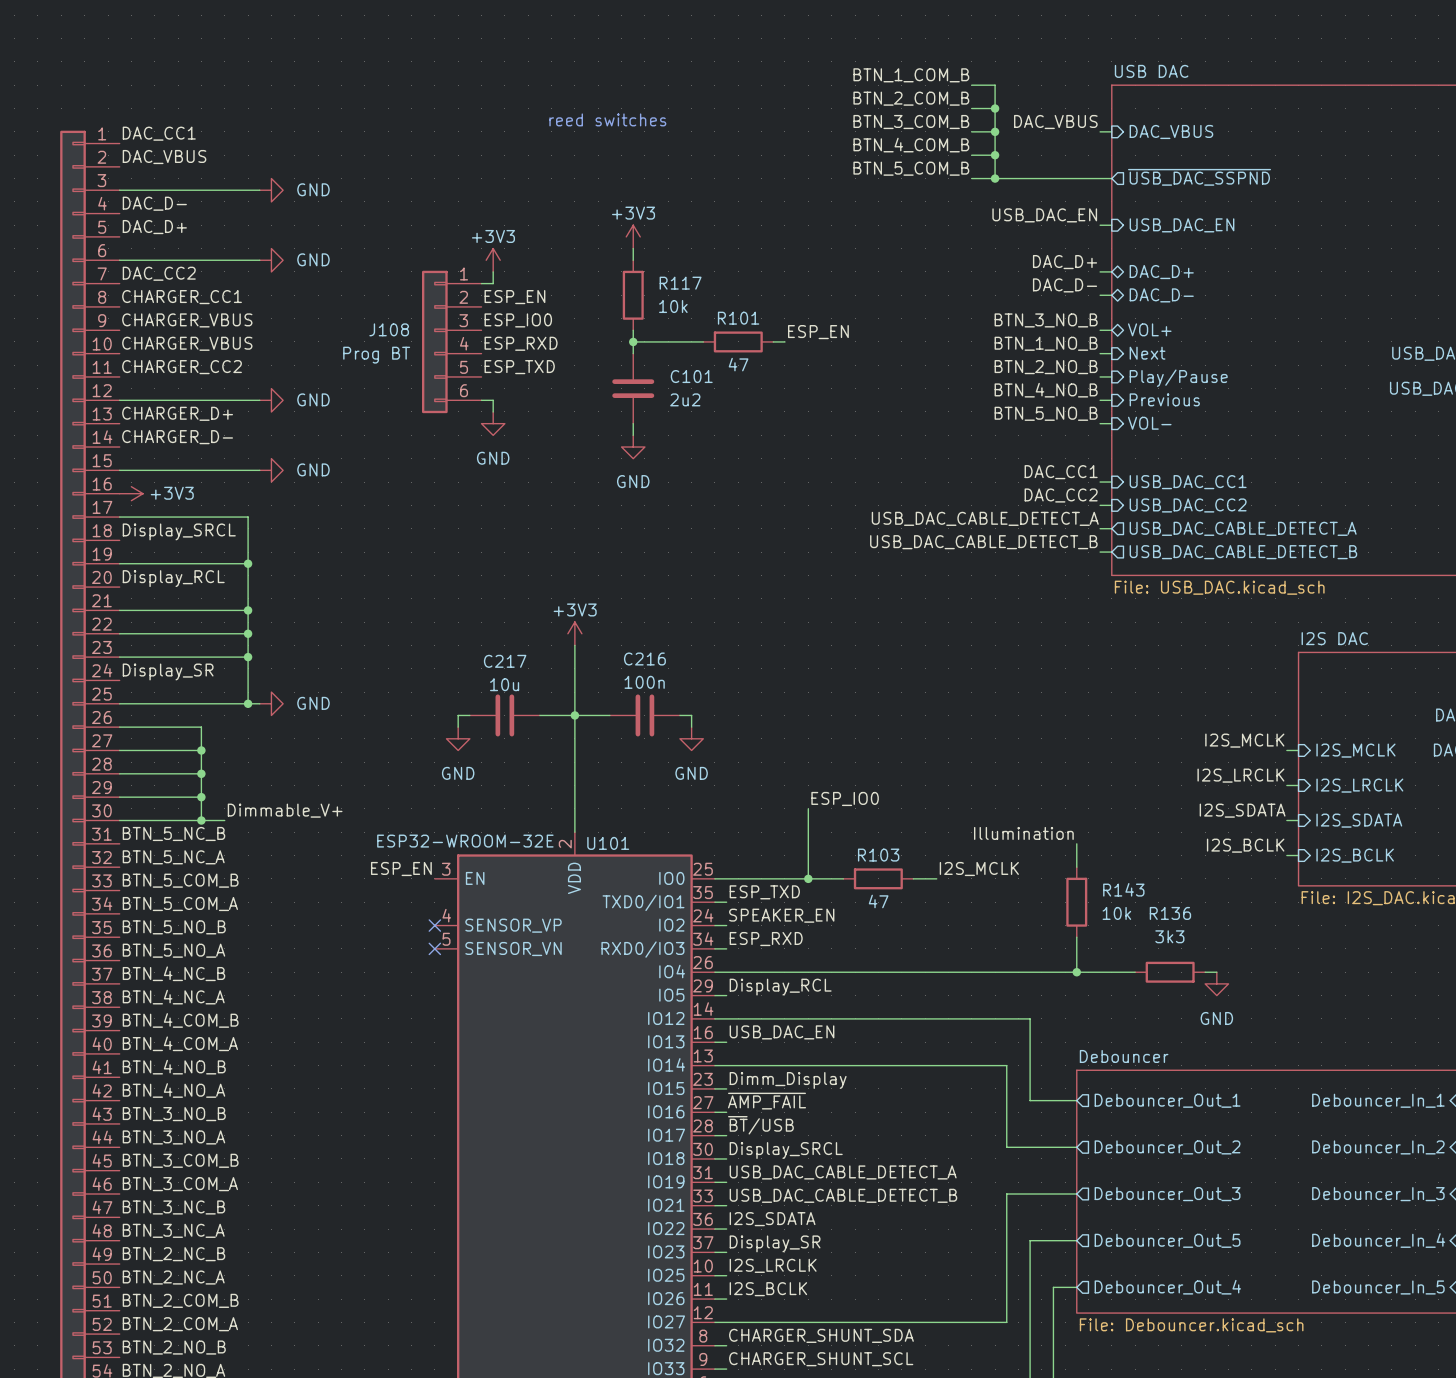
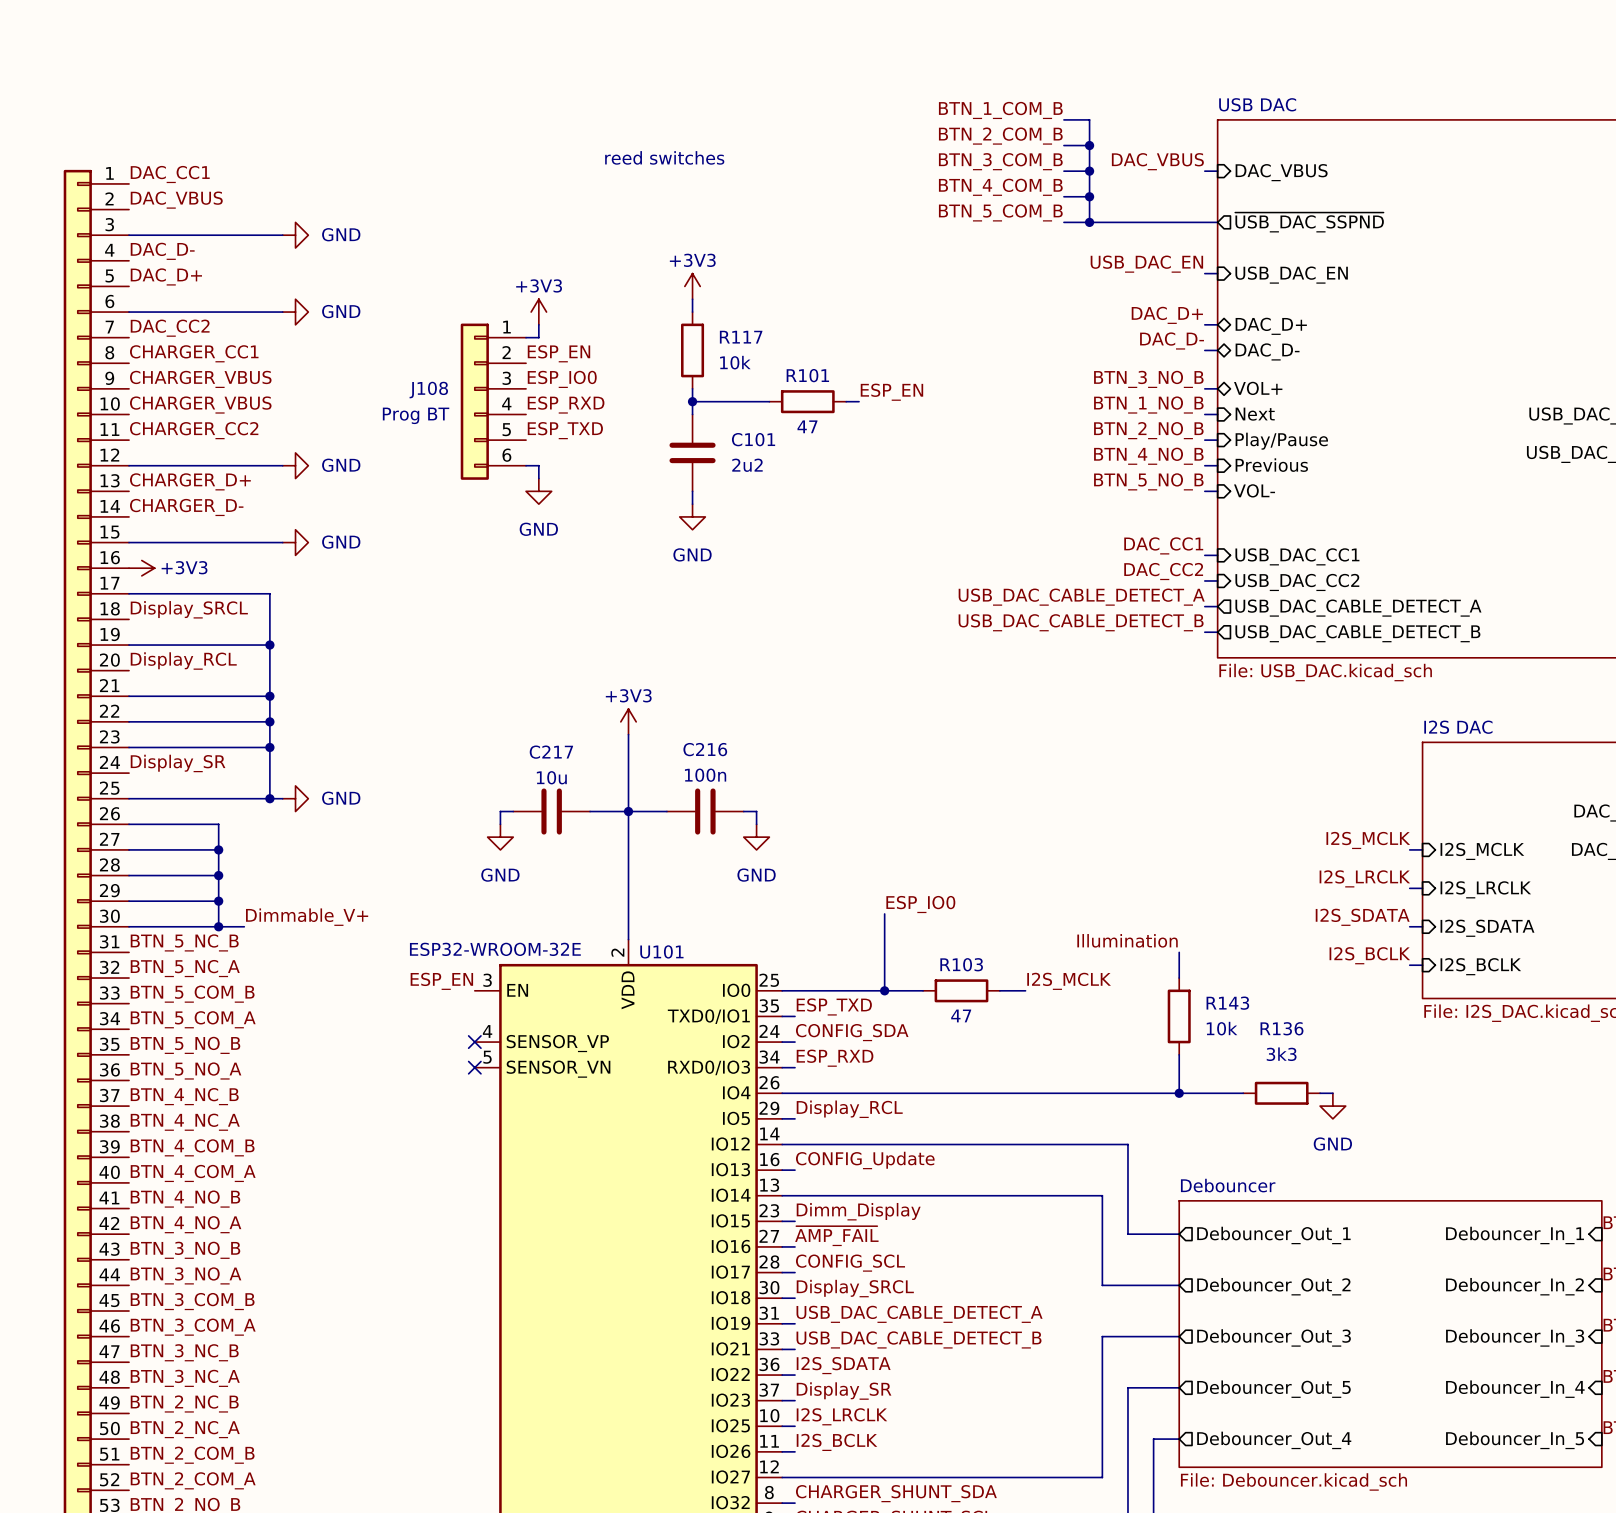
label: SPEAKER_EN (781, 915) -> CONFIG_SDA (852, 1032)
label: USB_DAC_EN (782, 1032) -> CONFIG_Update (865, 1160)
label: ~{BT}/USB (760, 1125) -> CONFIG_SCL (850, 1263)

